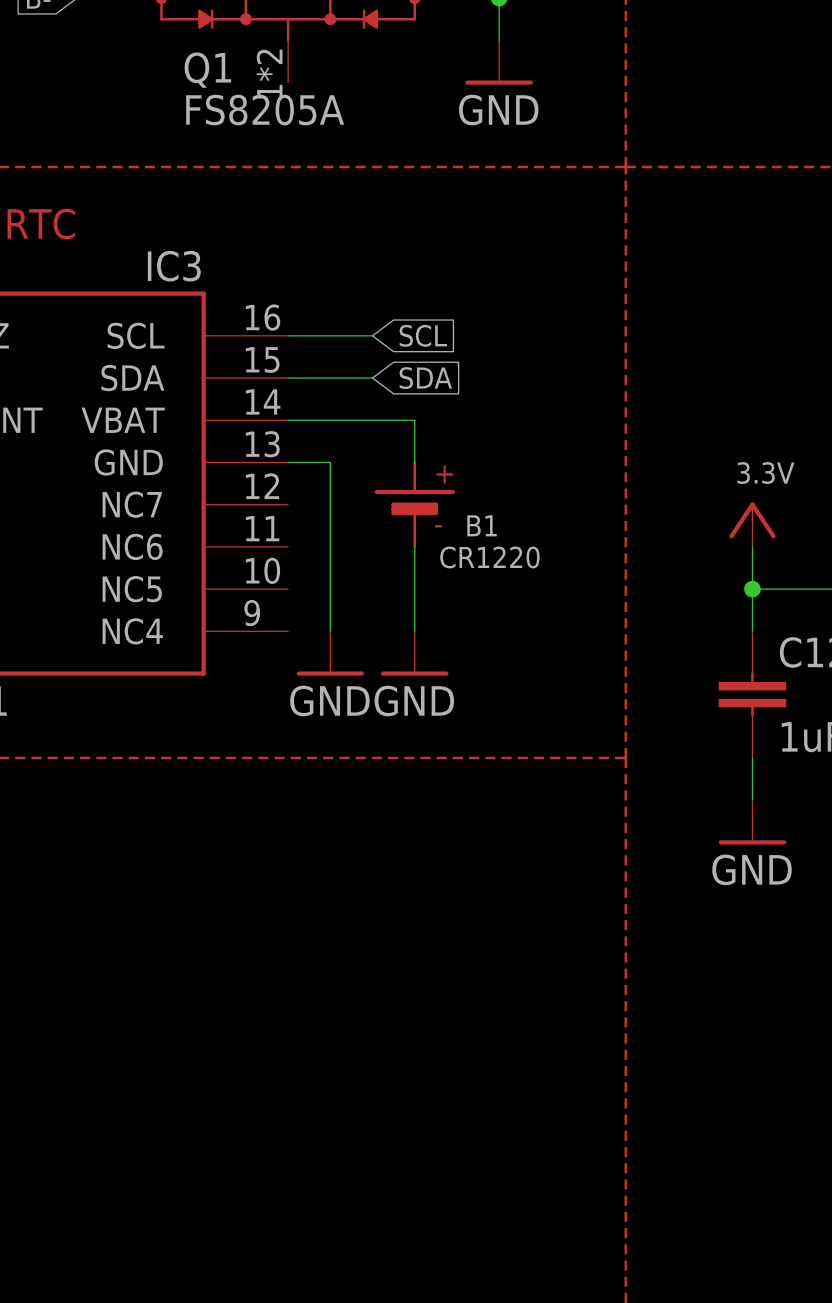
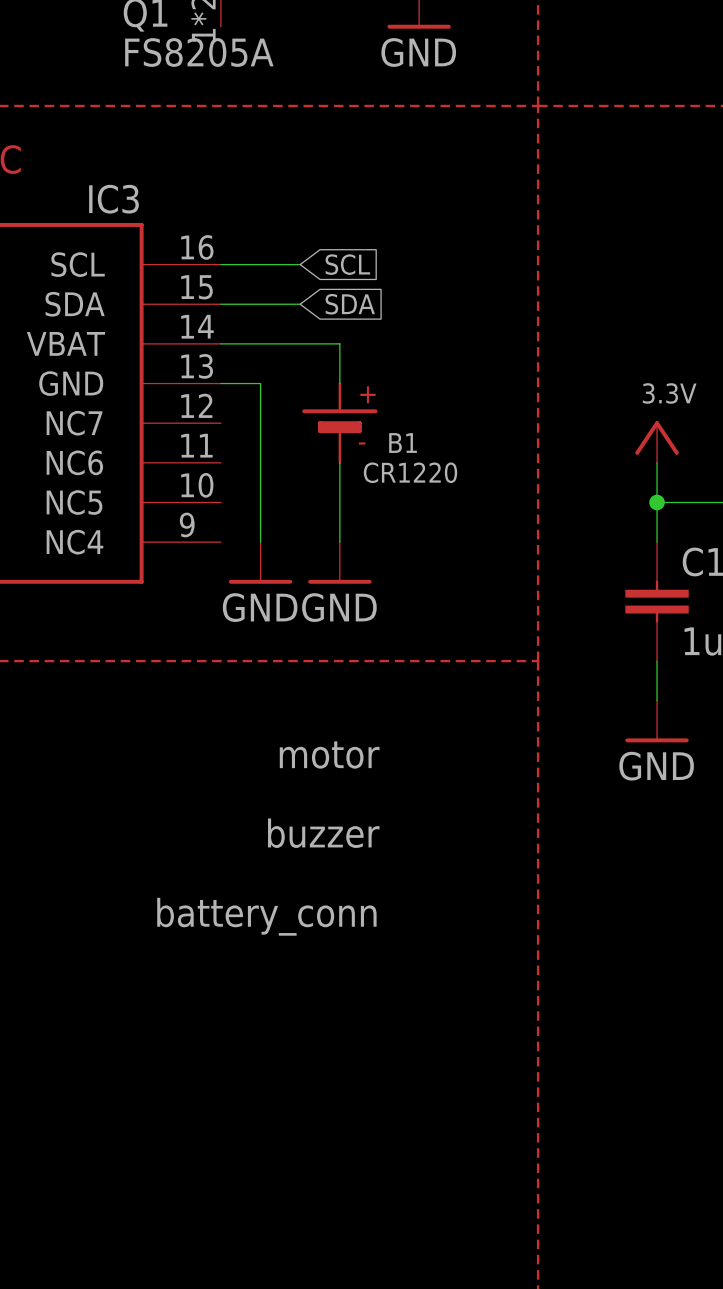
text: none -> motor (329, 755)
text: none -> buzzer (323, 833)
text: none -> battery_conn (266, 916)

